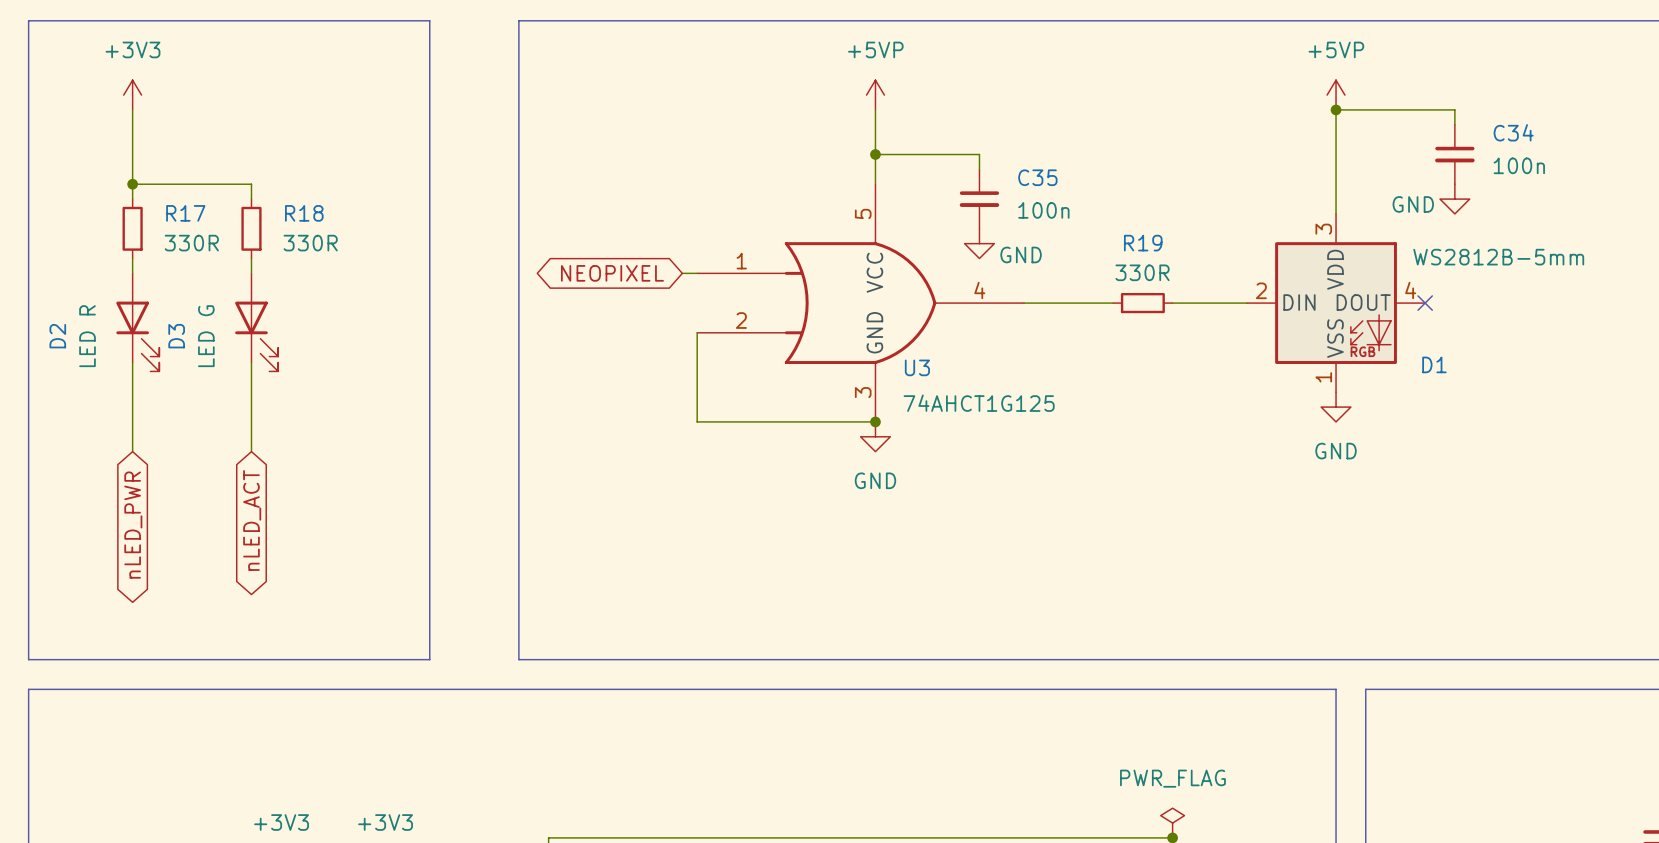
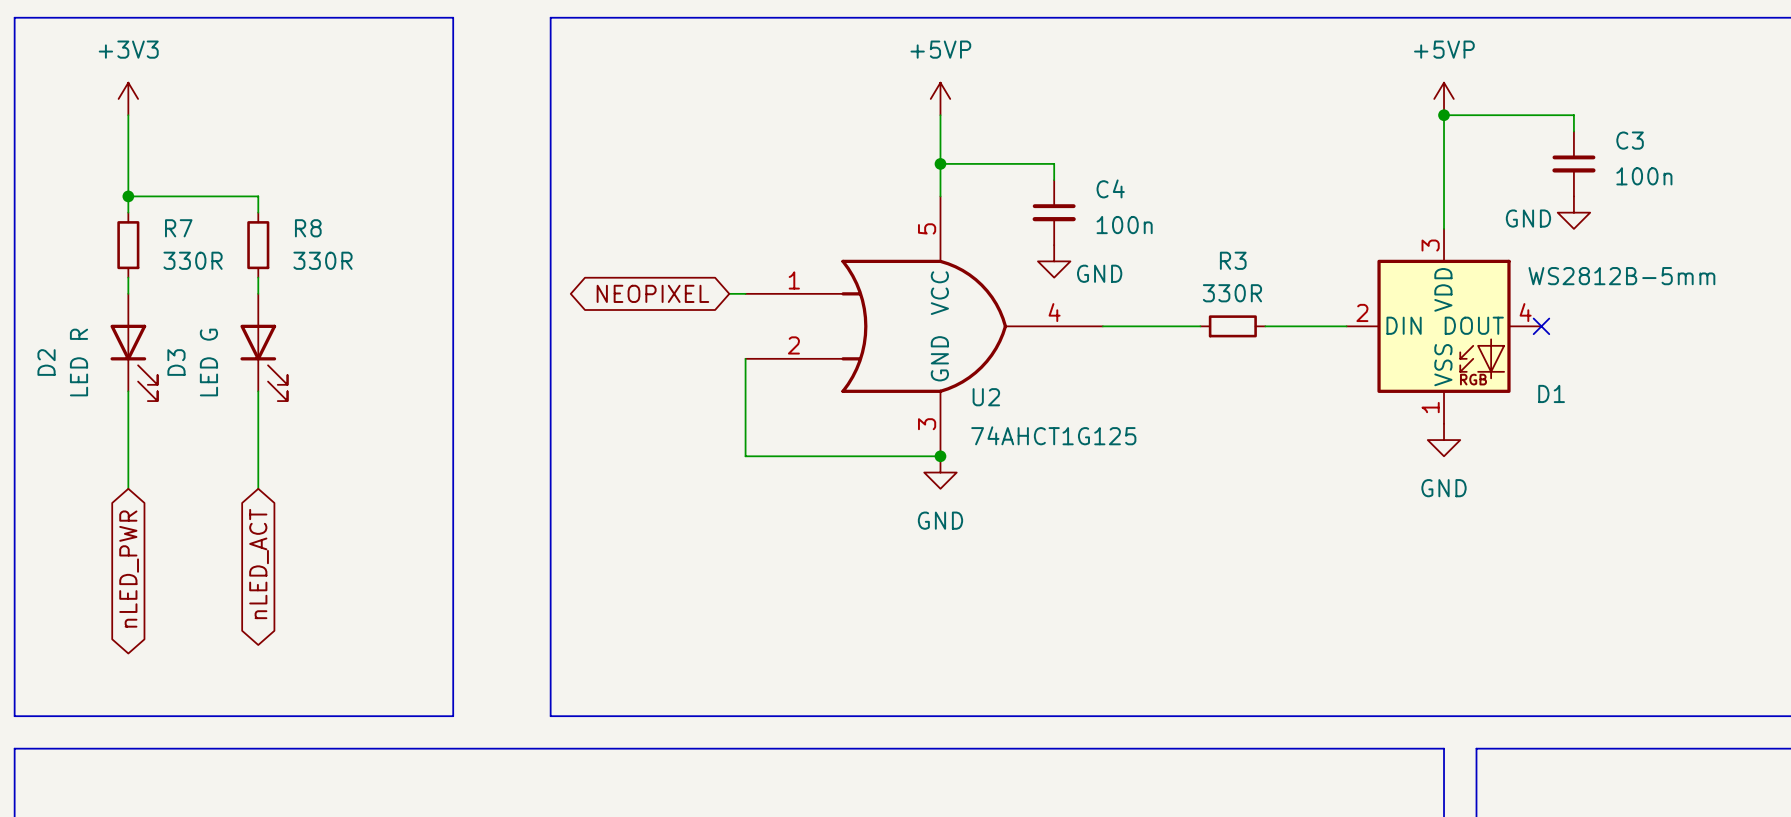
C34 name: C34 (1513, 132) -> C3 (1630, 140)
C35 name: C35 (1037, 177) -> C4 (1110, 188)
R17 name: R17 (185, 213) -> R7 (178, 228)
R18 name: R18 (304, 213) -> R8 (308, 228)
R19 name: R19 (1143, 243) -> R3 (1233, 260)
U3 name: U3 (917, 367) -> U2 (986, 397)

